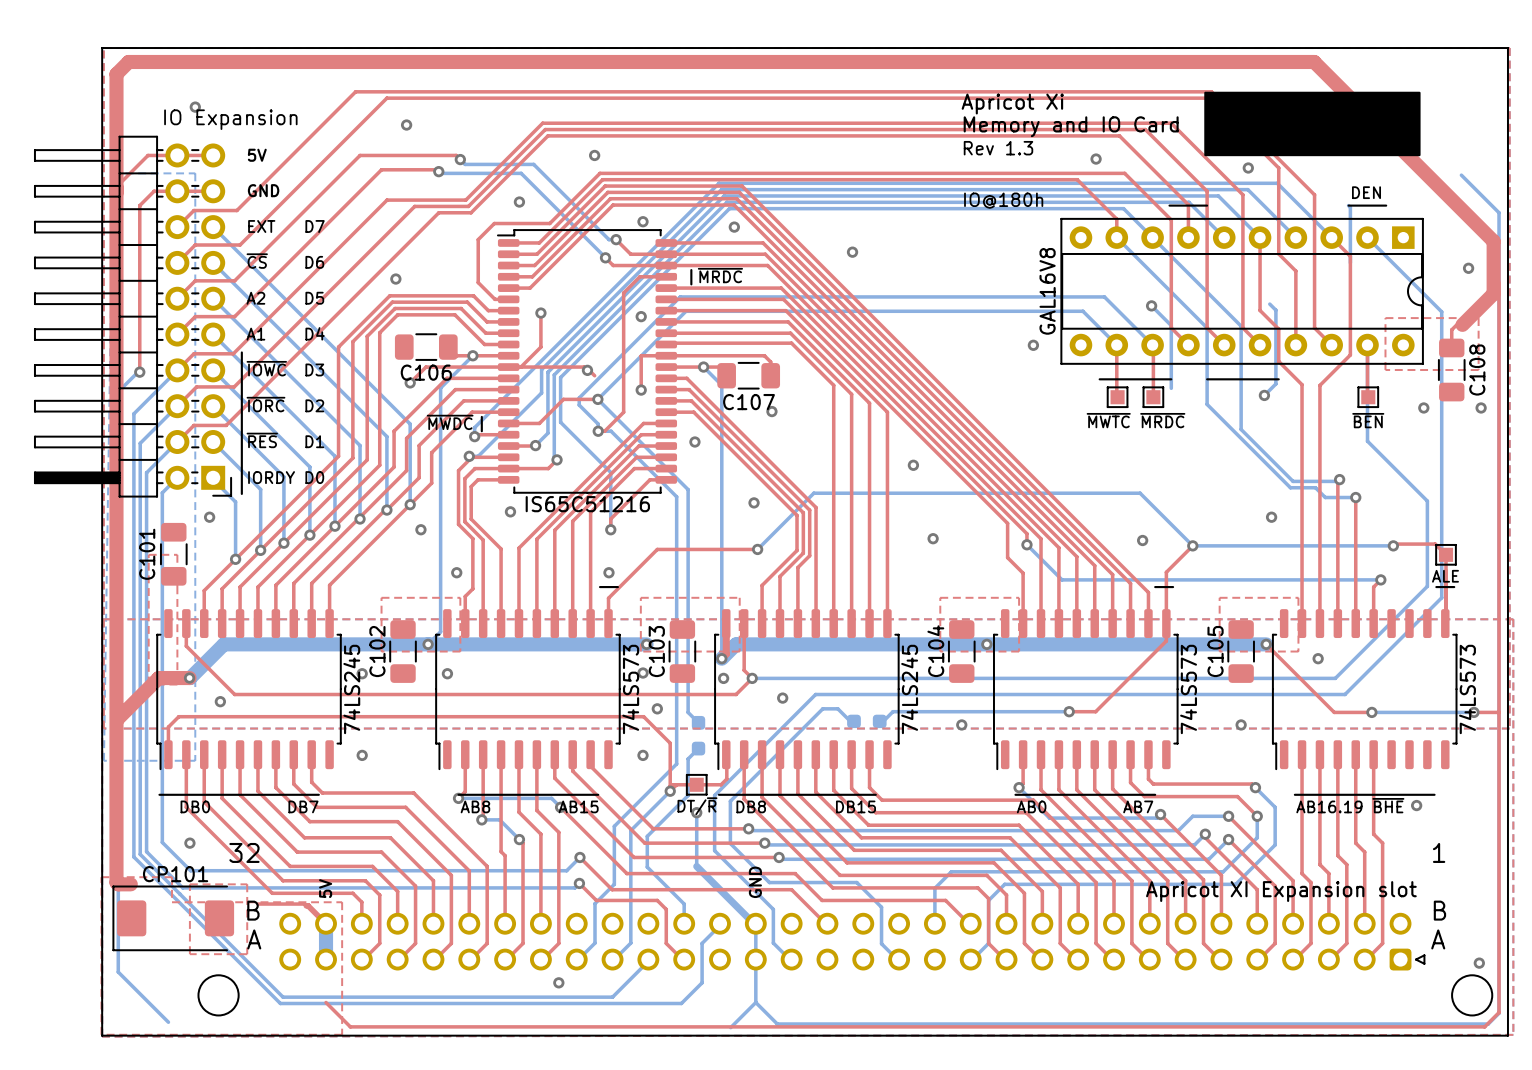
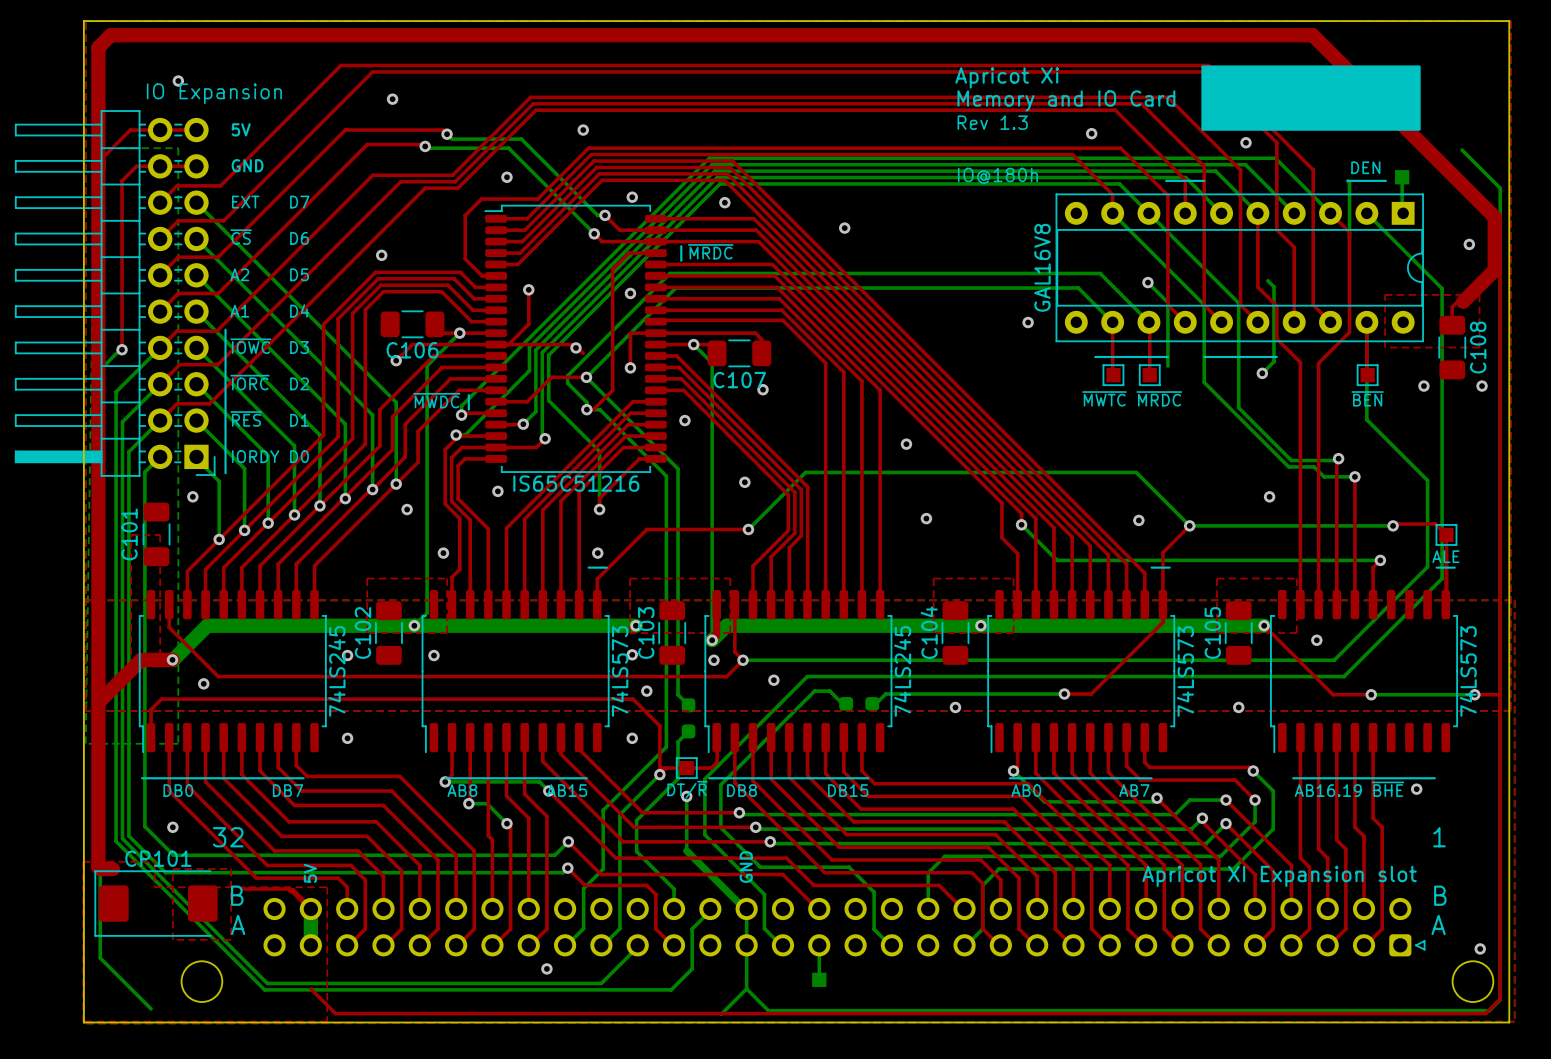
part: none -> (1402, 177)
bottom track: none -> (1401, 181) (1402, 212)
bottom track: none -> (819, 947) (819, 979)
part: none -> (819, 979)

